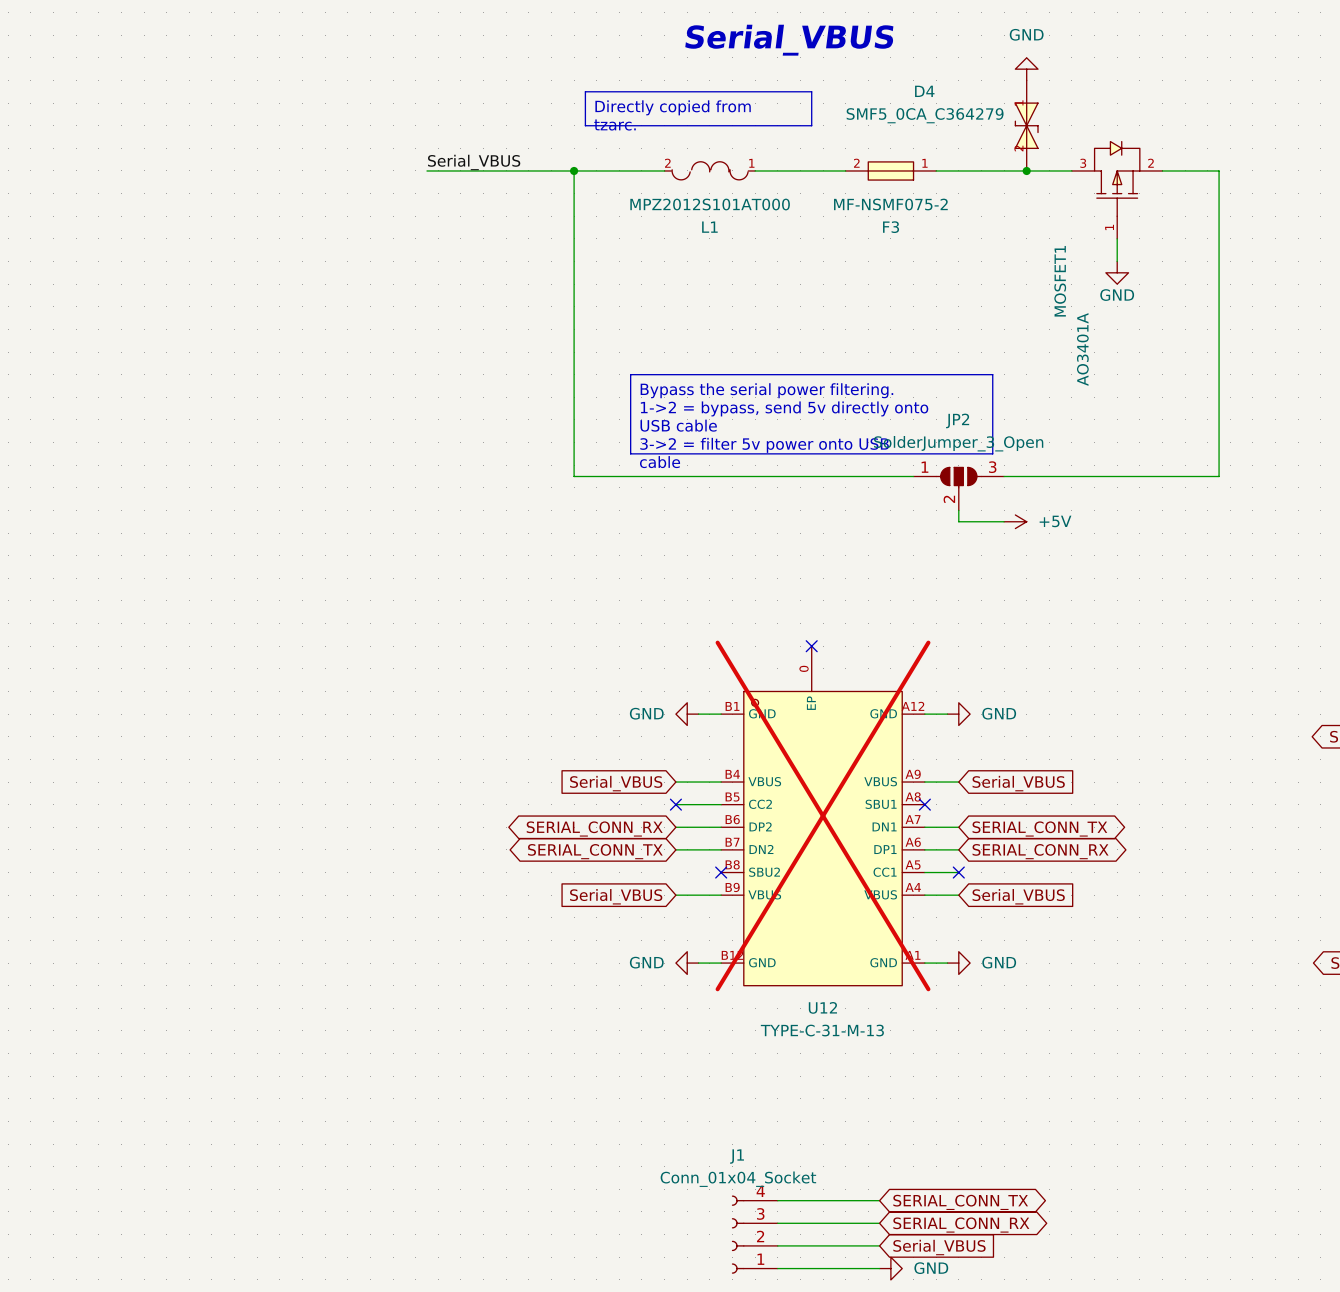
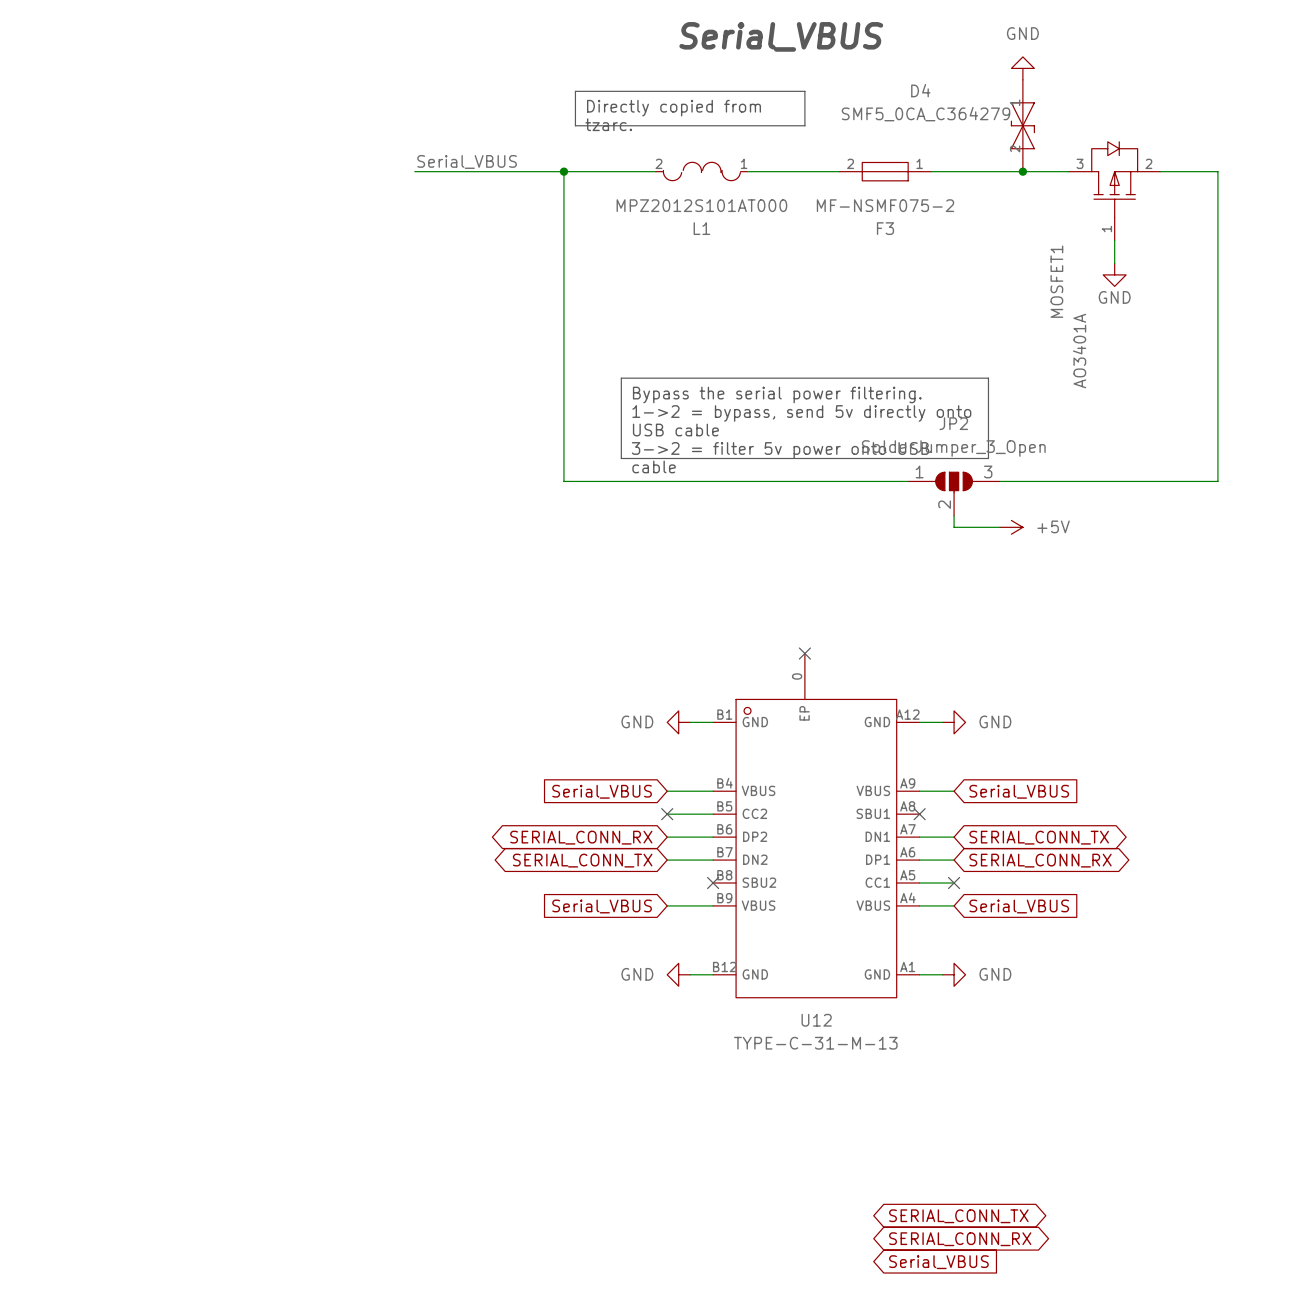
U12 do-not-place cross: (823, 815) -> none
wire: (777, 1200) (879, 1200) -> none
wire: (777, 1223) (879, 1223) -> none
J1: Conn_01x04_Socket (754, 1234) -> none
wire: (777, 1245) (879, 1245) -> none
wire: (777, 1268) (879, 1268) -> none
power symbol: GND (890, 1268) -> none

